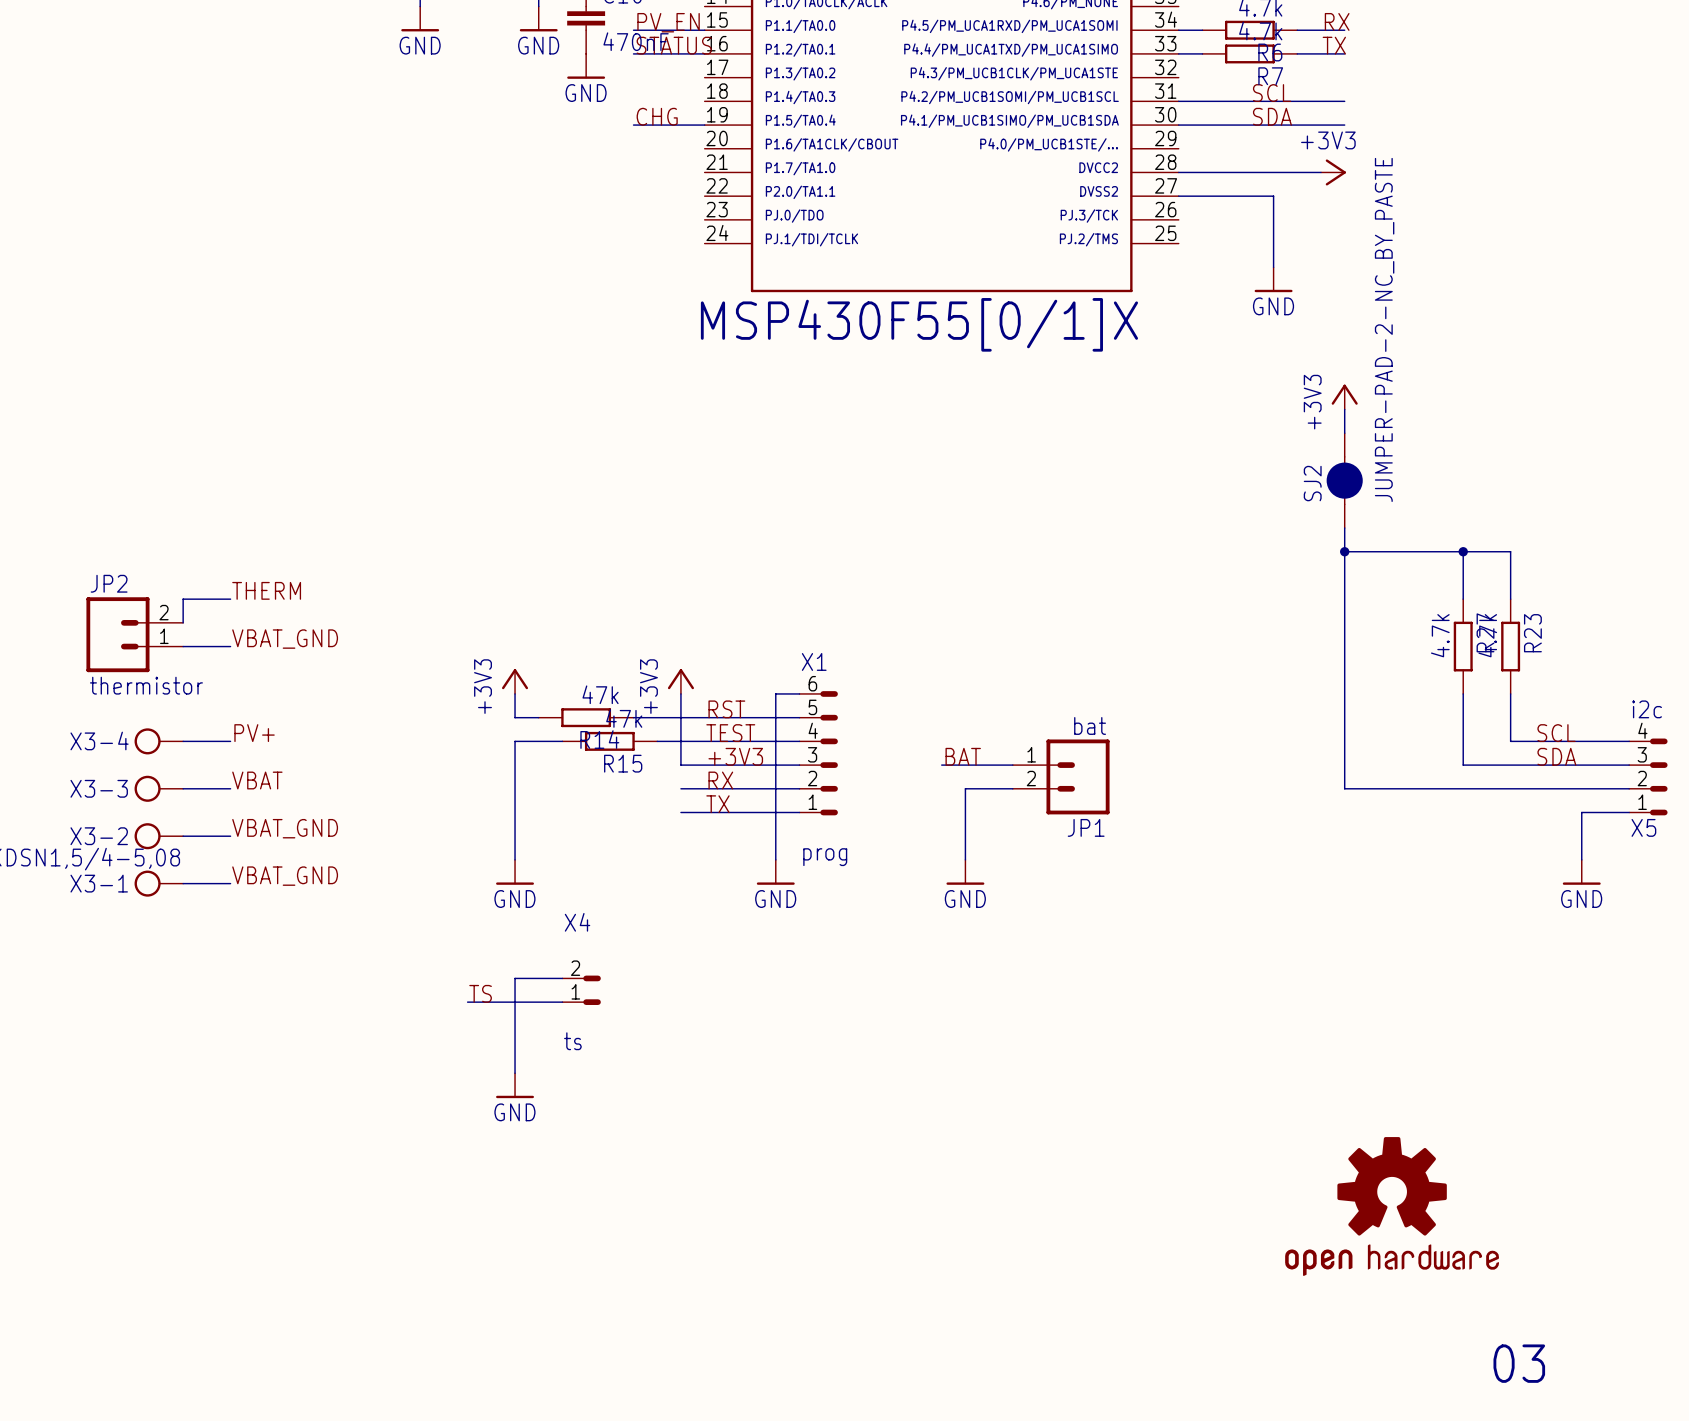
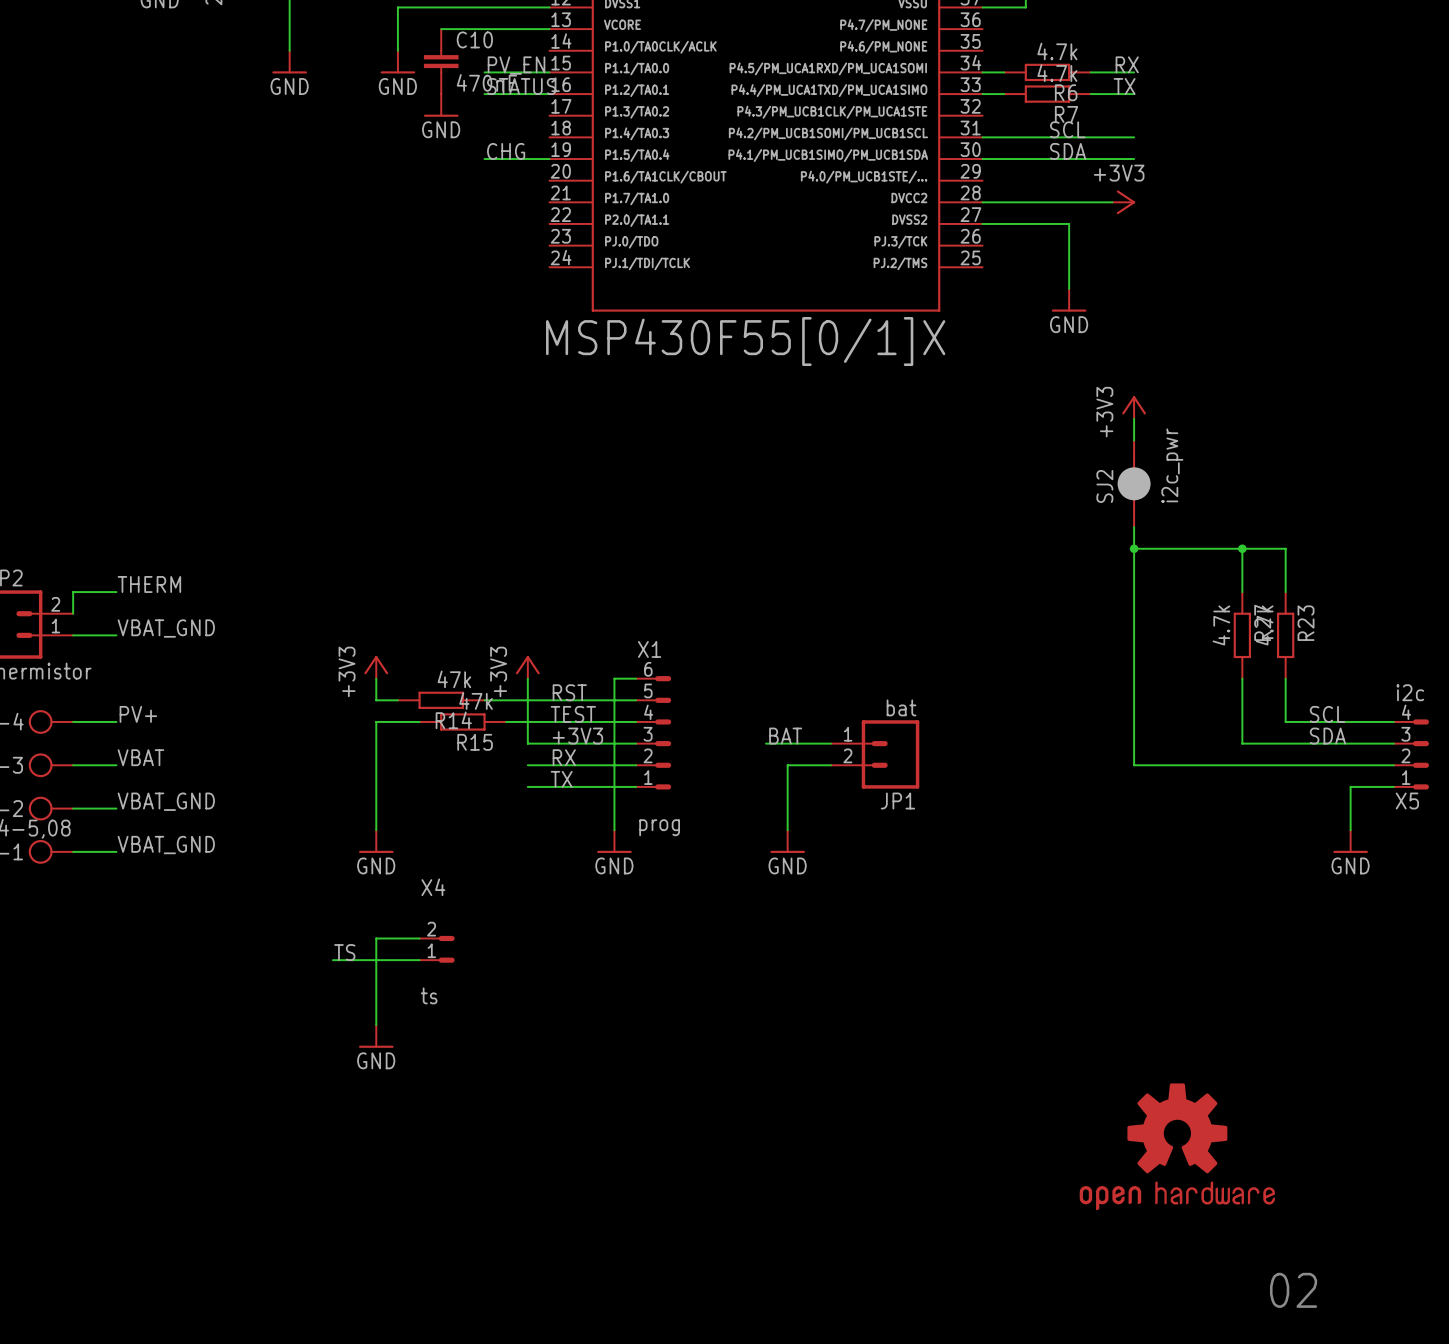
SJ2 value: JUMPER-PAD-2-NC_BY_PASTE (1384, 329) -> i2c_pwr (1172, 465)
text: 03 (1519, 1363) -> 02 (1293, 1290)

